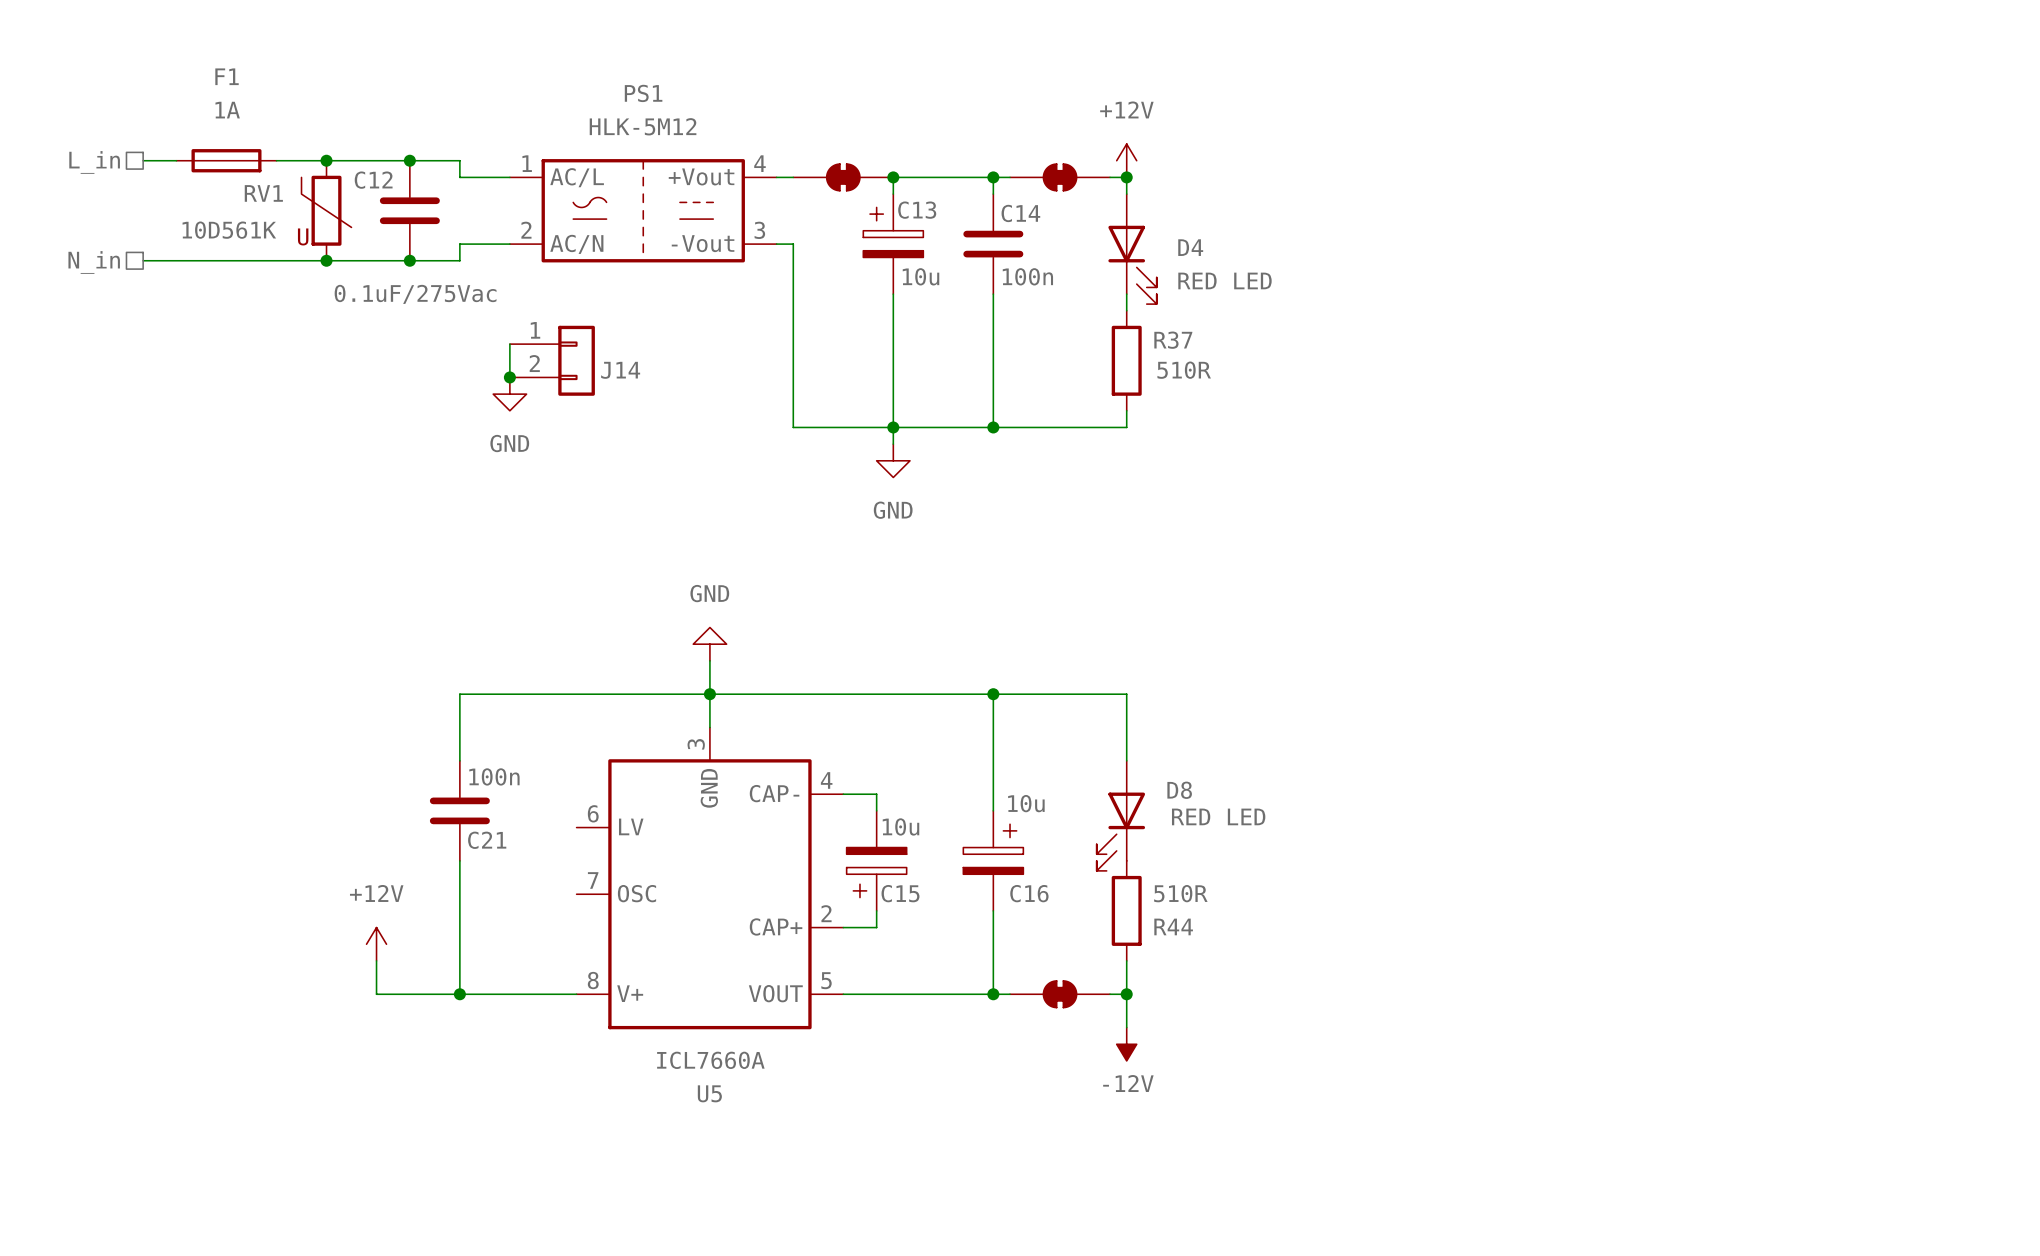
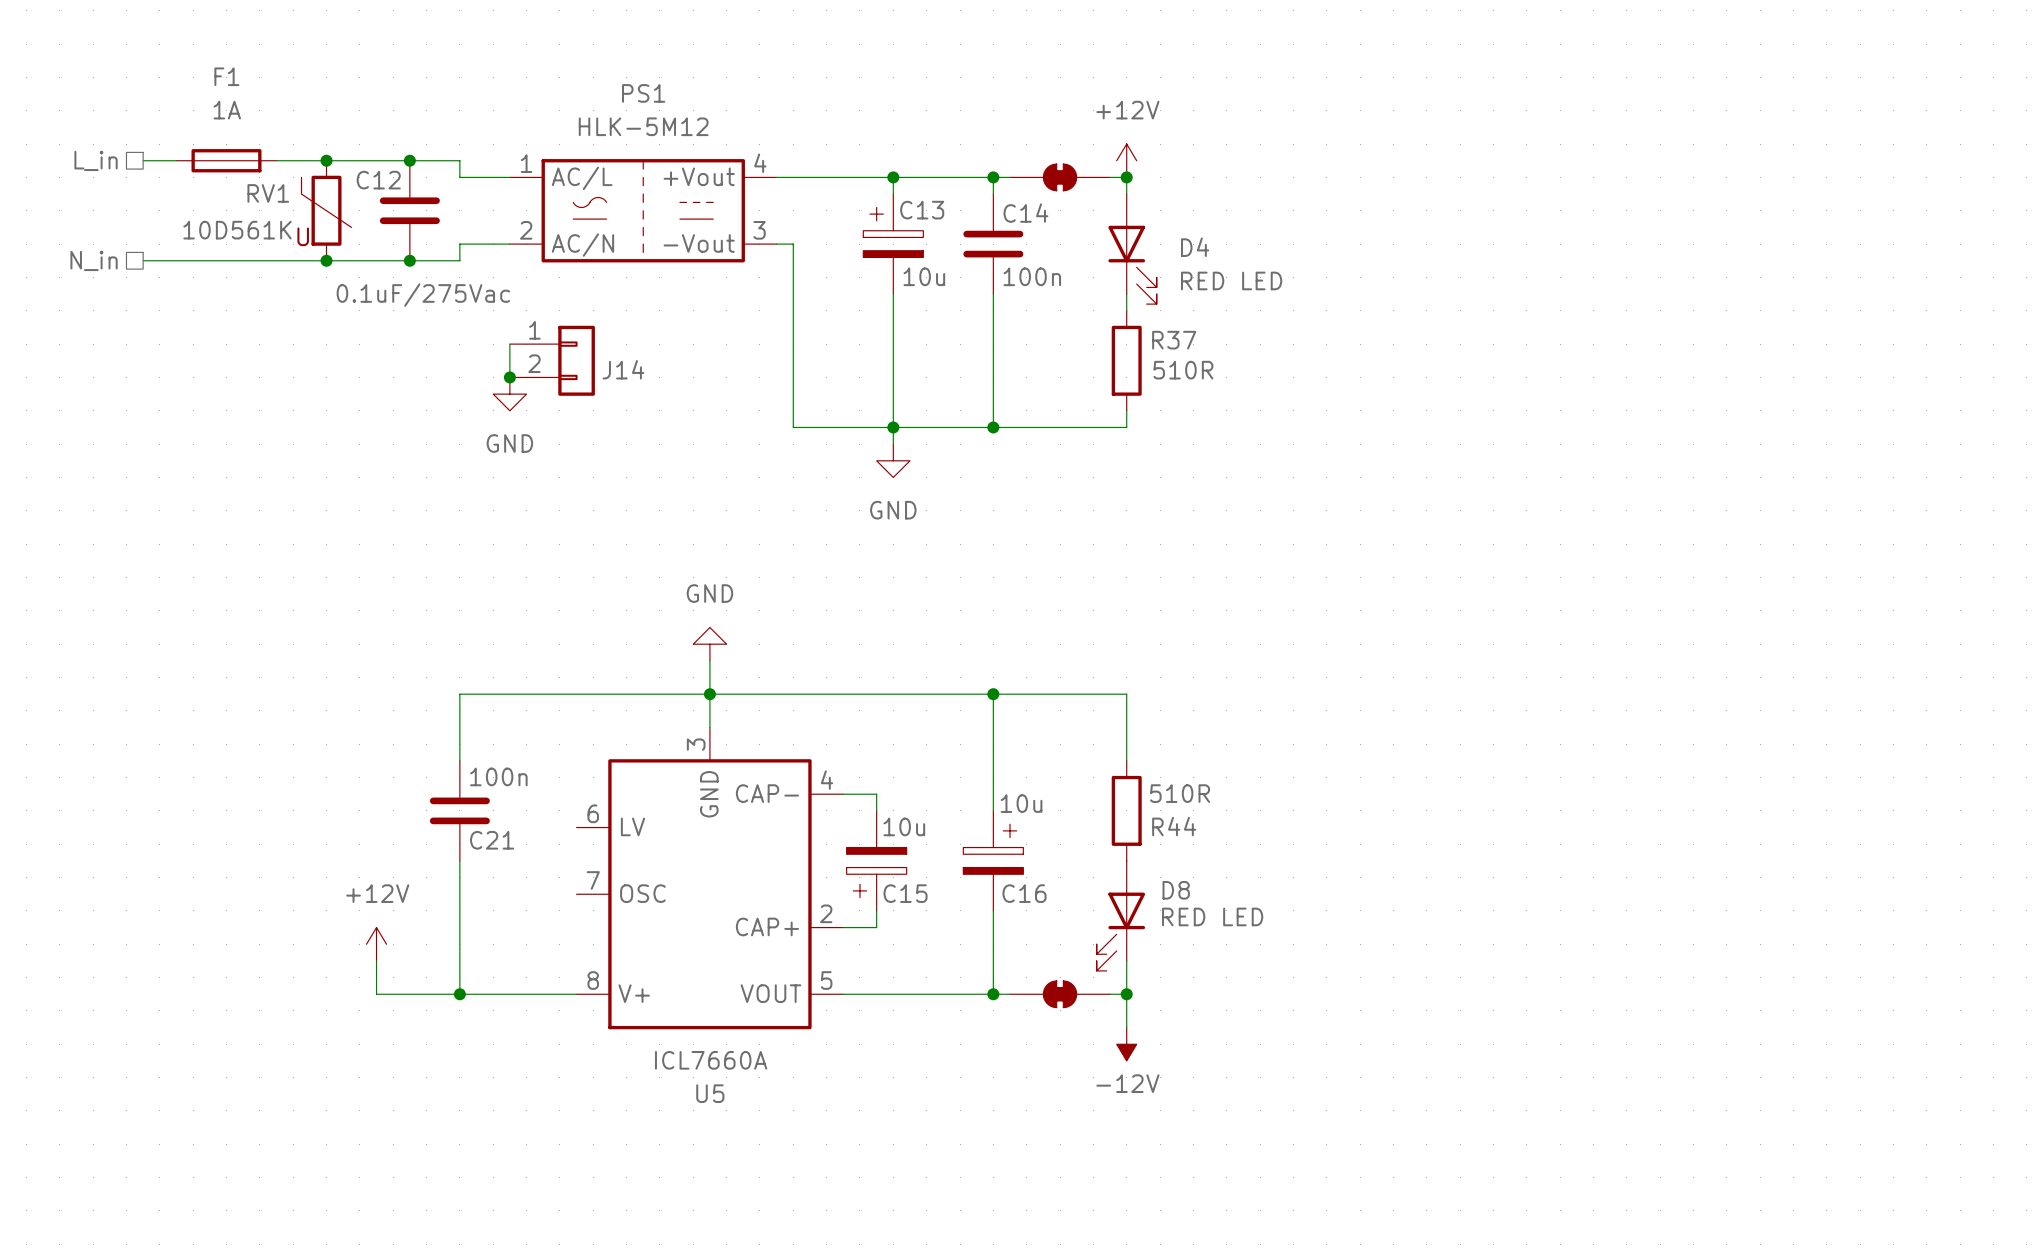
part: (843, 177) -> none
D8 position: (1120, 815) -> (1120, 915)
R44 position: (1126, 910) -> (1126, 810)

